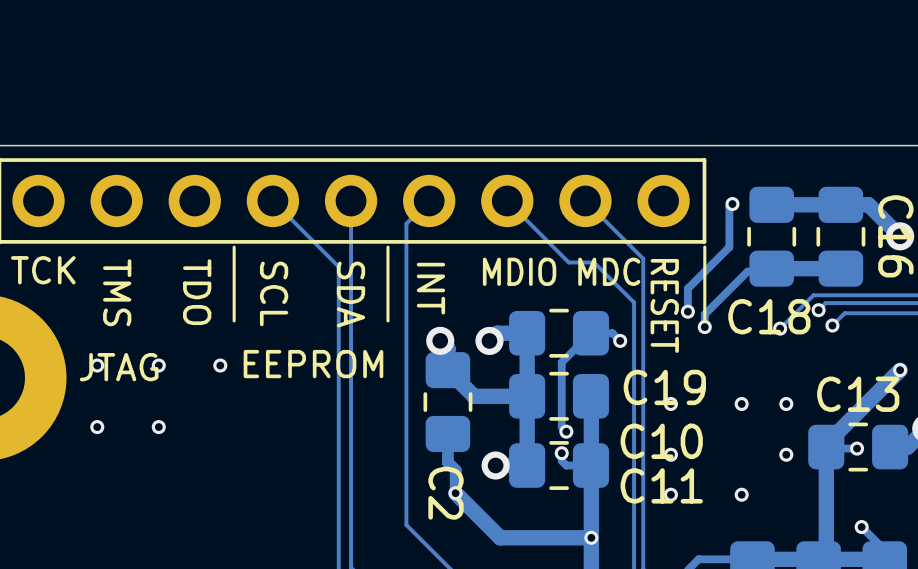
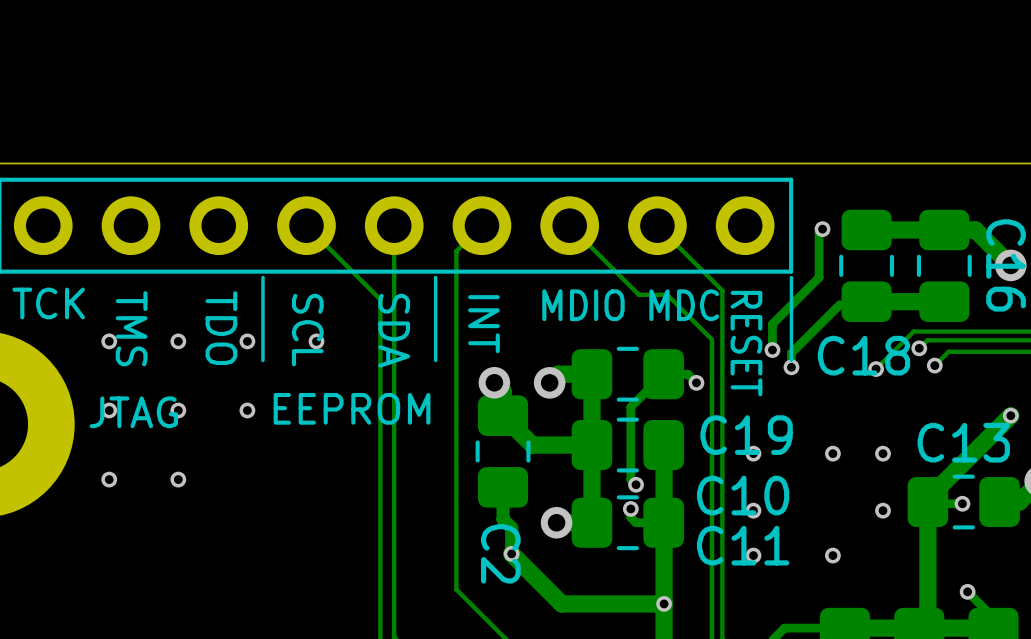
via: none -> (109, 341)
via: none -> (178, 341)
via: none -> (247, 341)
via: none -> (316, 341)

